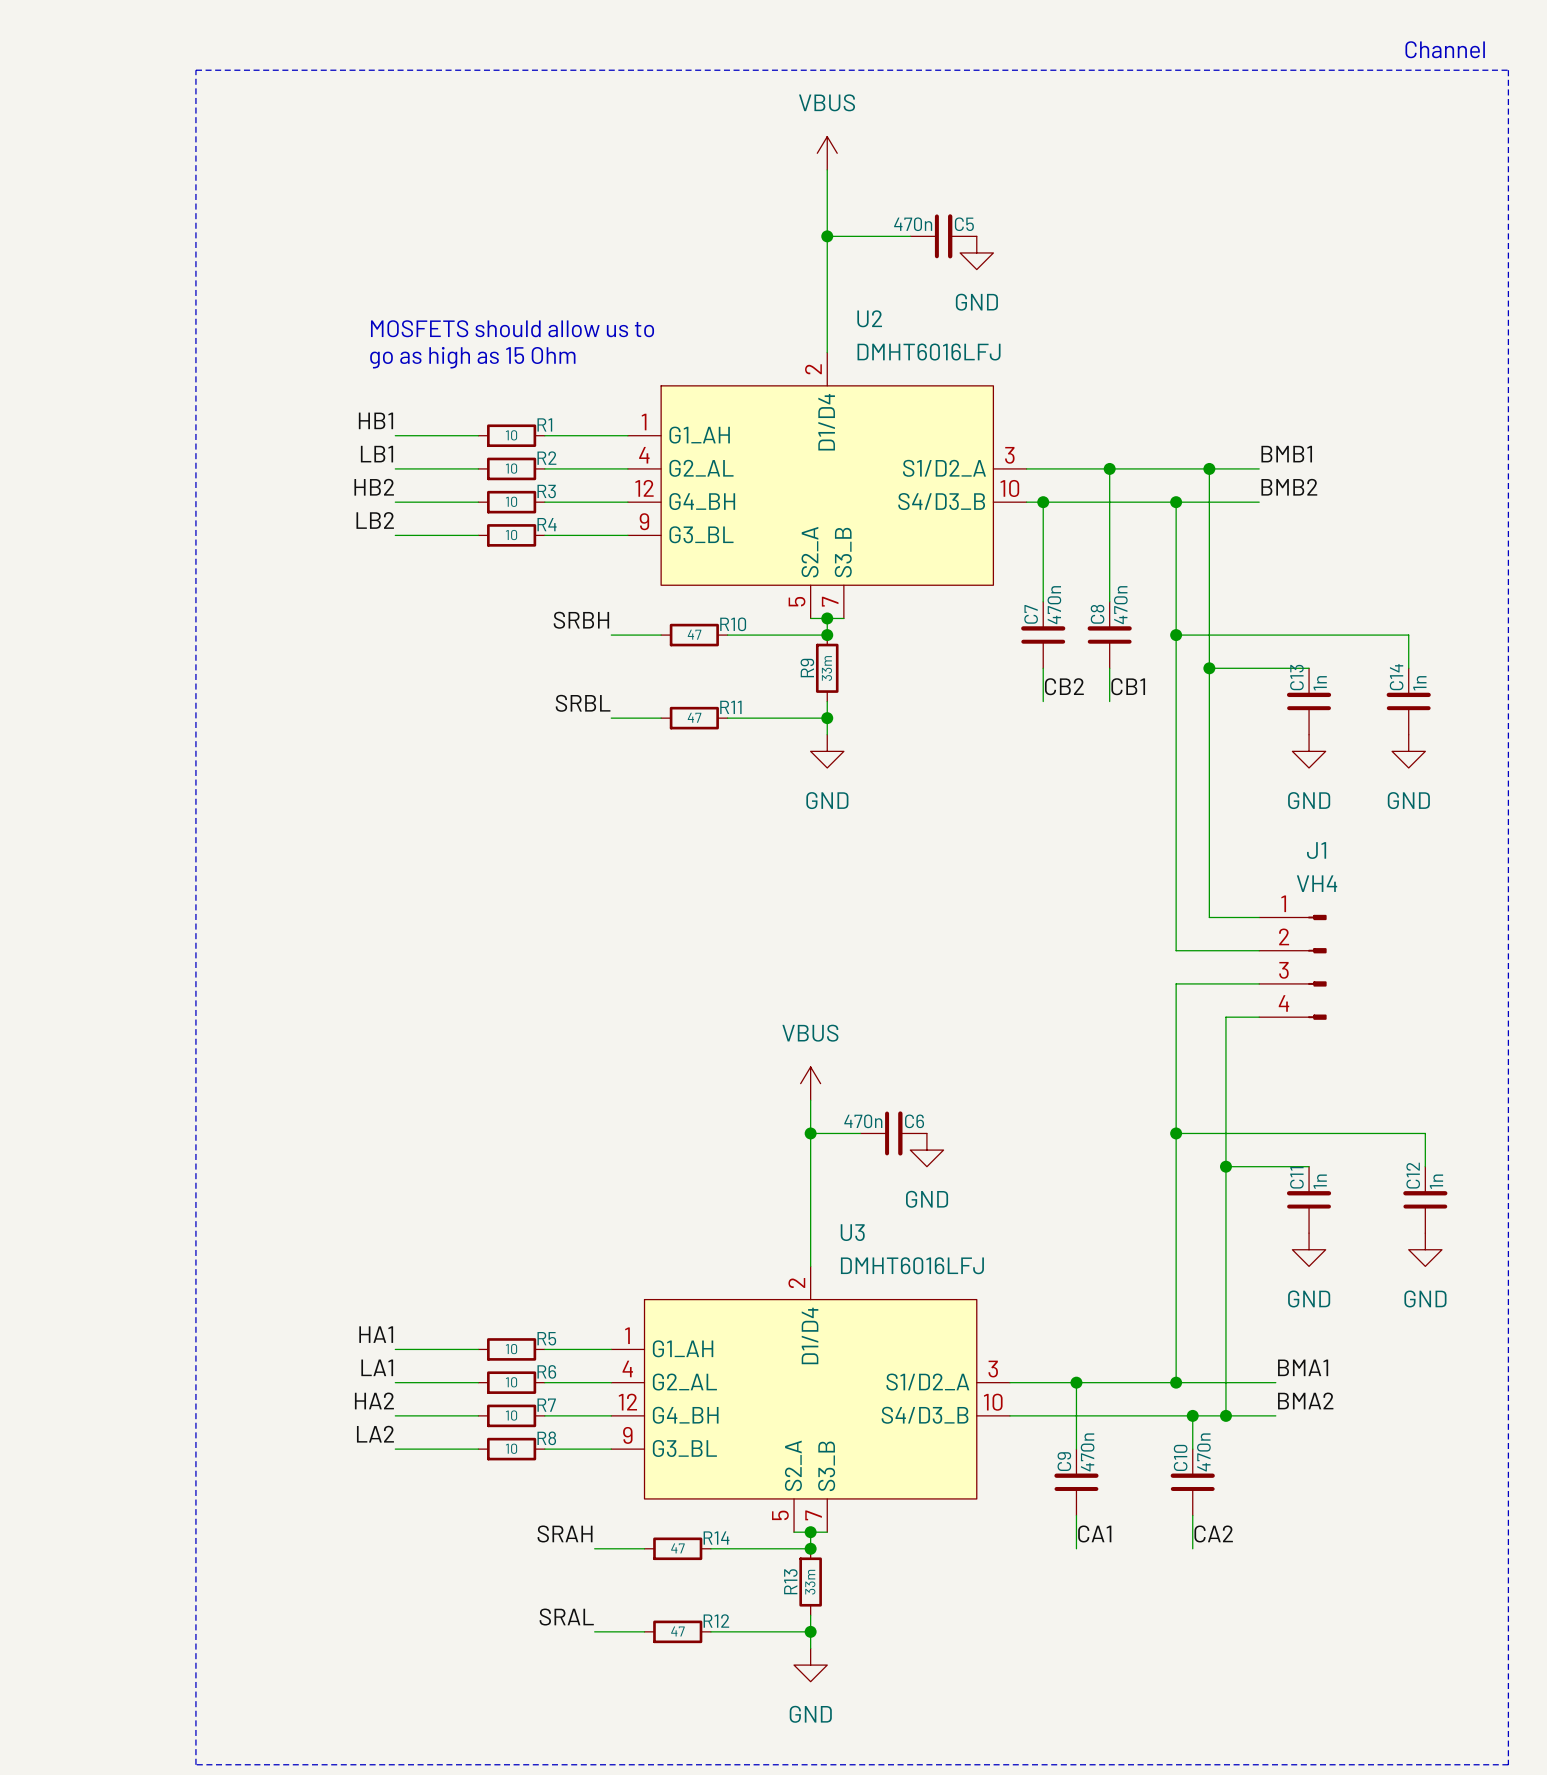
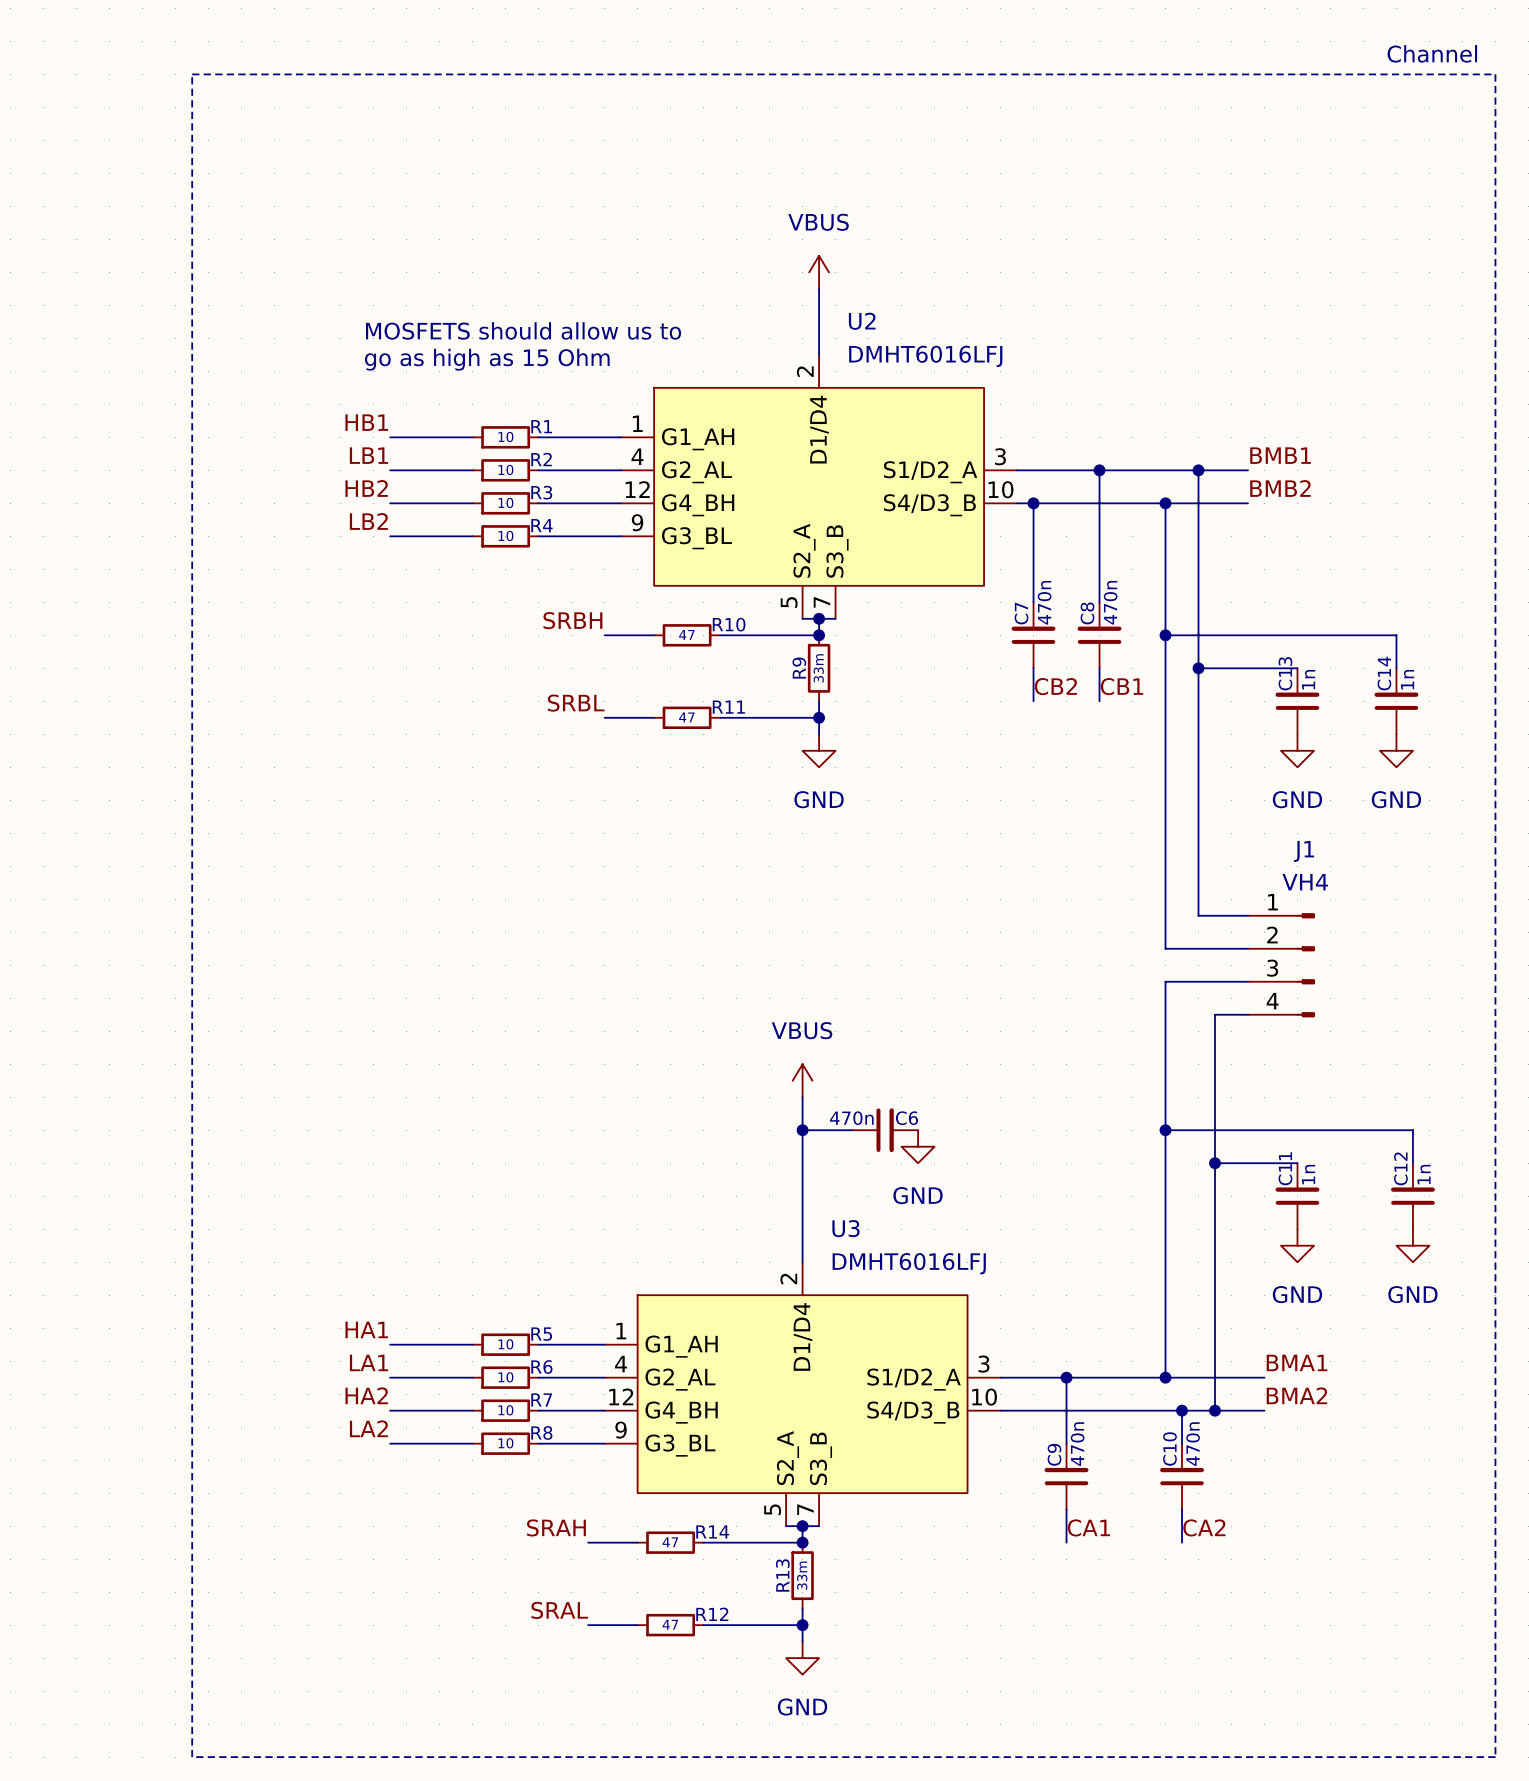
power symbol position: VBUS (827, 153) -> VBUS (819, 272)
wire: (827, 169) (827, 286) -> none
wire: (827, 236) (910, 236) -> none
junction: (827, 236) -> none
C5: 470n (943, 236) -> none
power symbol: GND (976, 252) -> none

